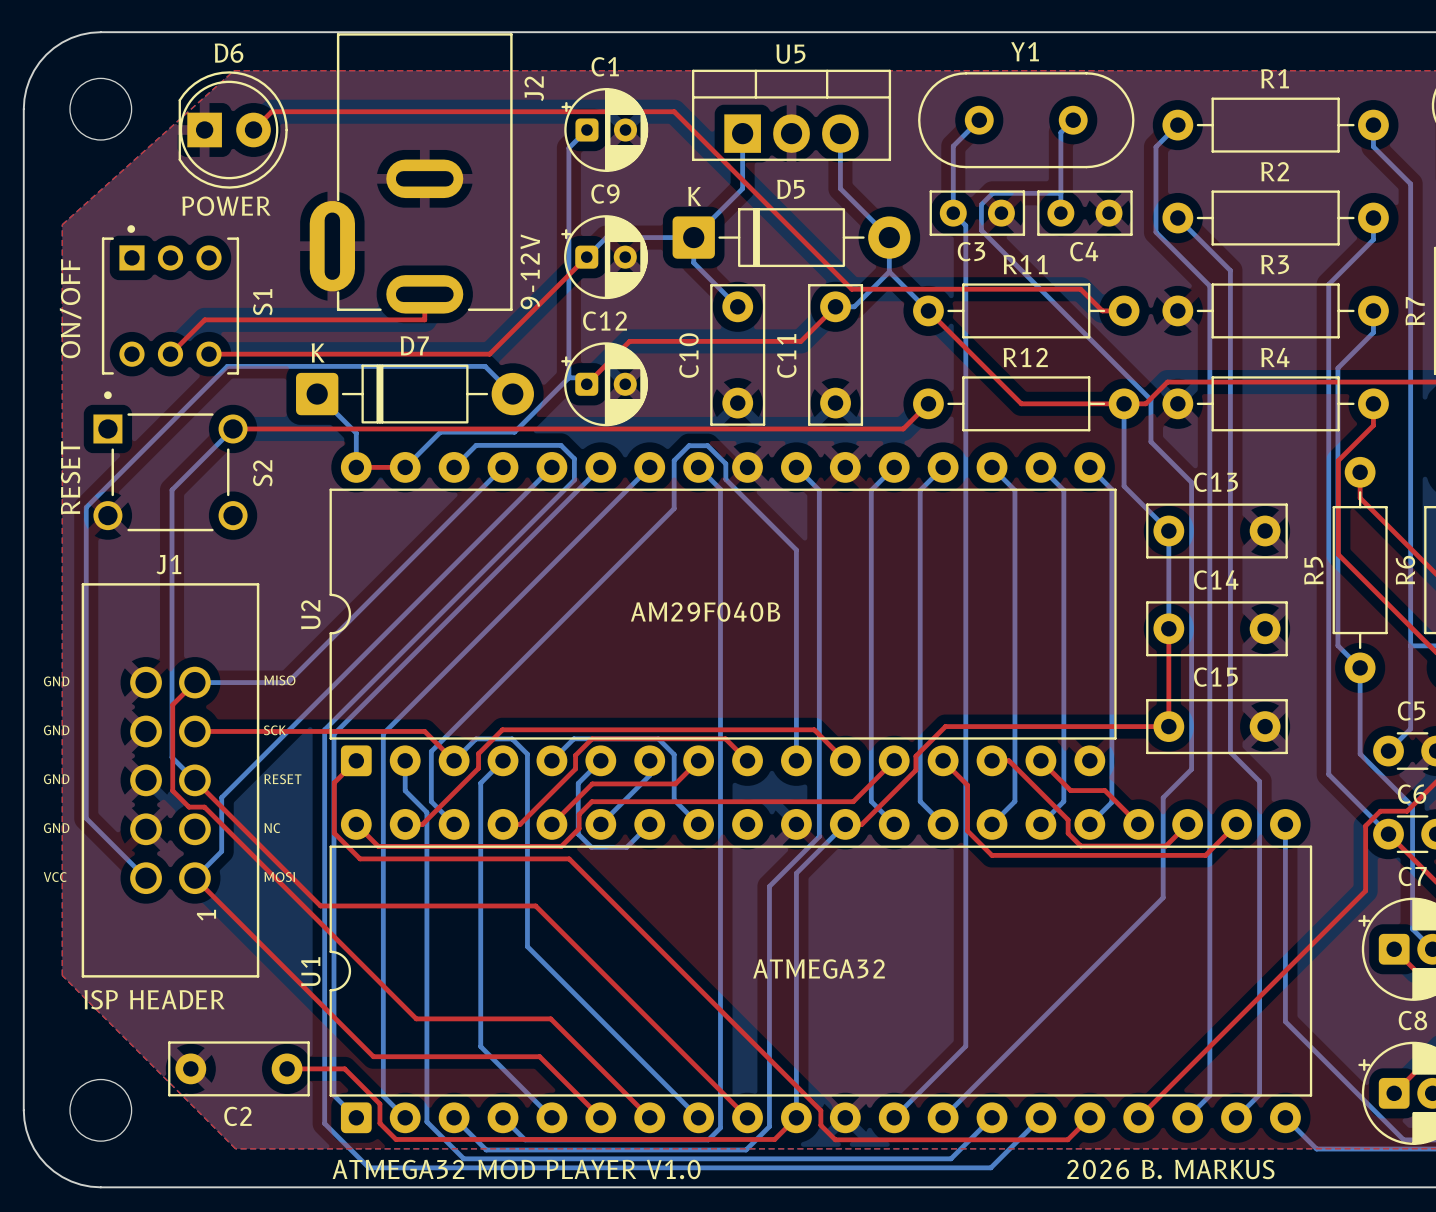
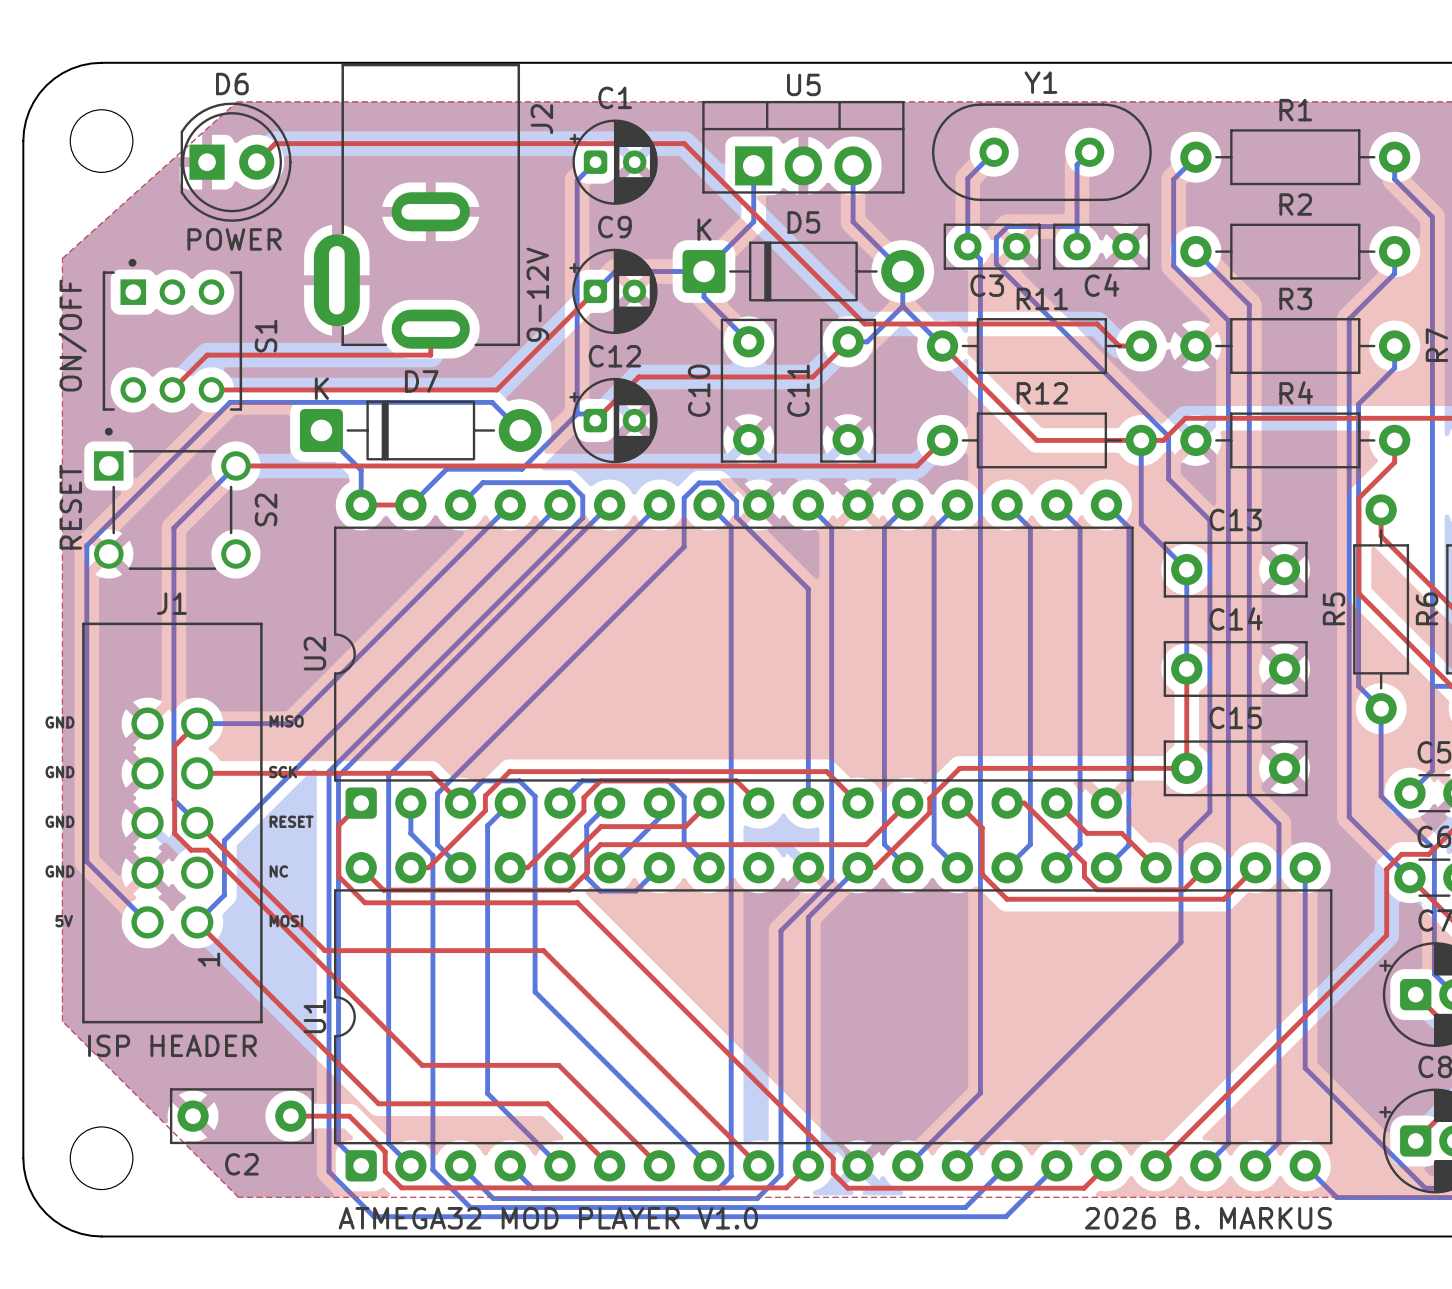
text: AM29F040B (705, 612) -> none
text: VCC (55, 877) -> 5V (64, 921)
text: ATMEGA32 (819, 968) -> none

